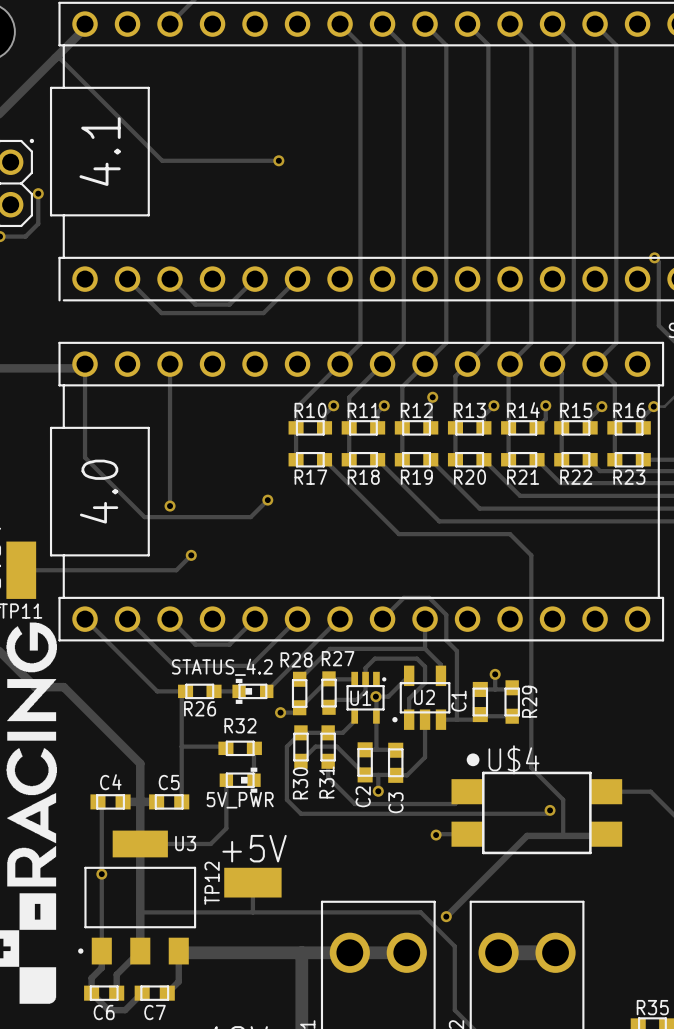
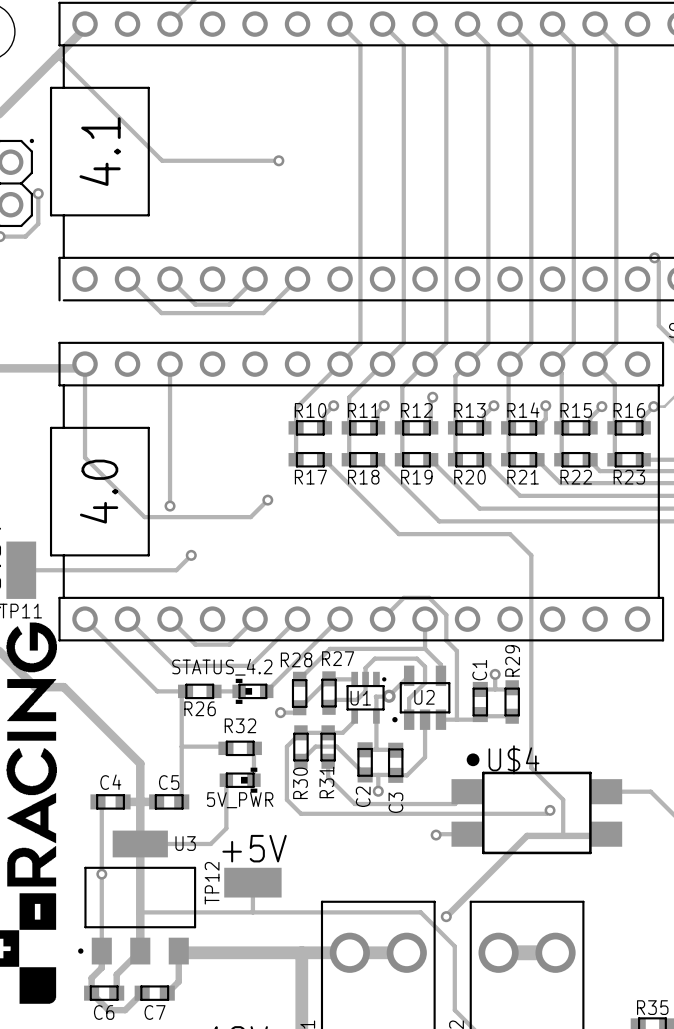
via: (375, 696) -> none
via: none -> (389, 696)
C1 name position: C1 (458, 701) -> C1 (479, 670)
R29 name position: R29 (529, 701) -> R29 (512, 660)

